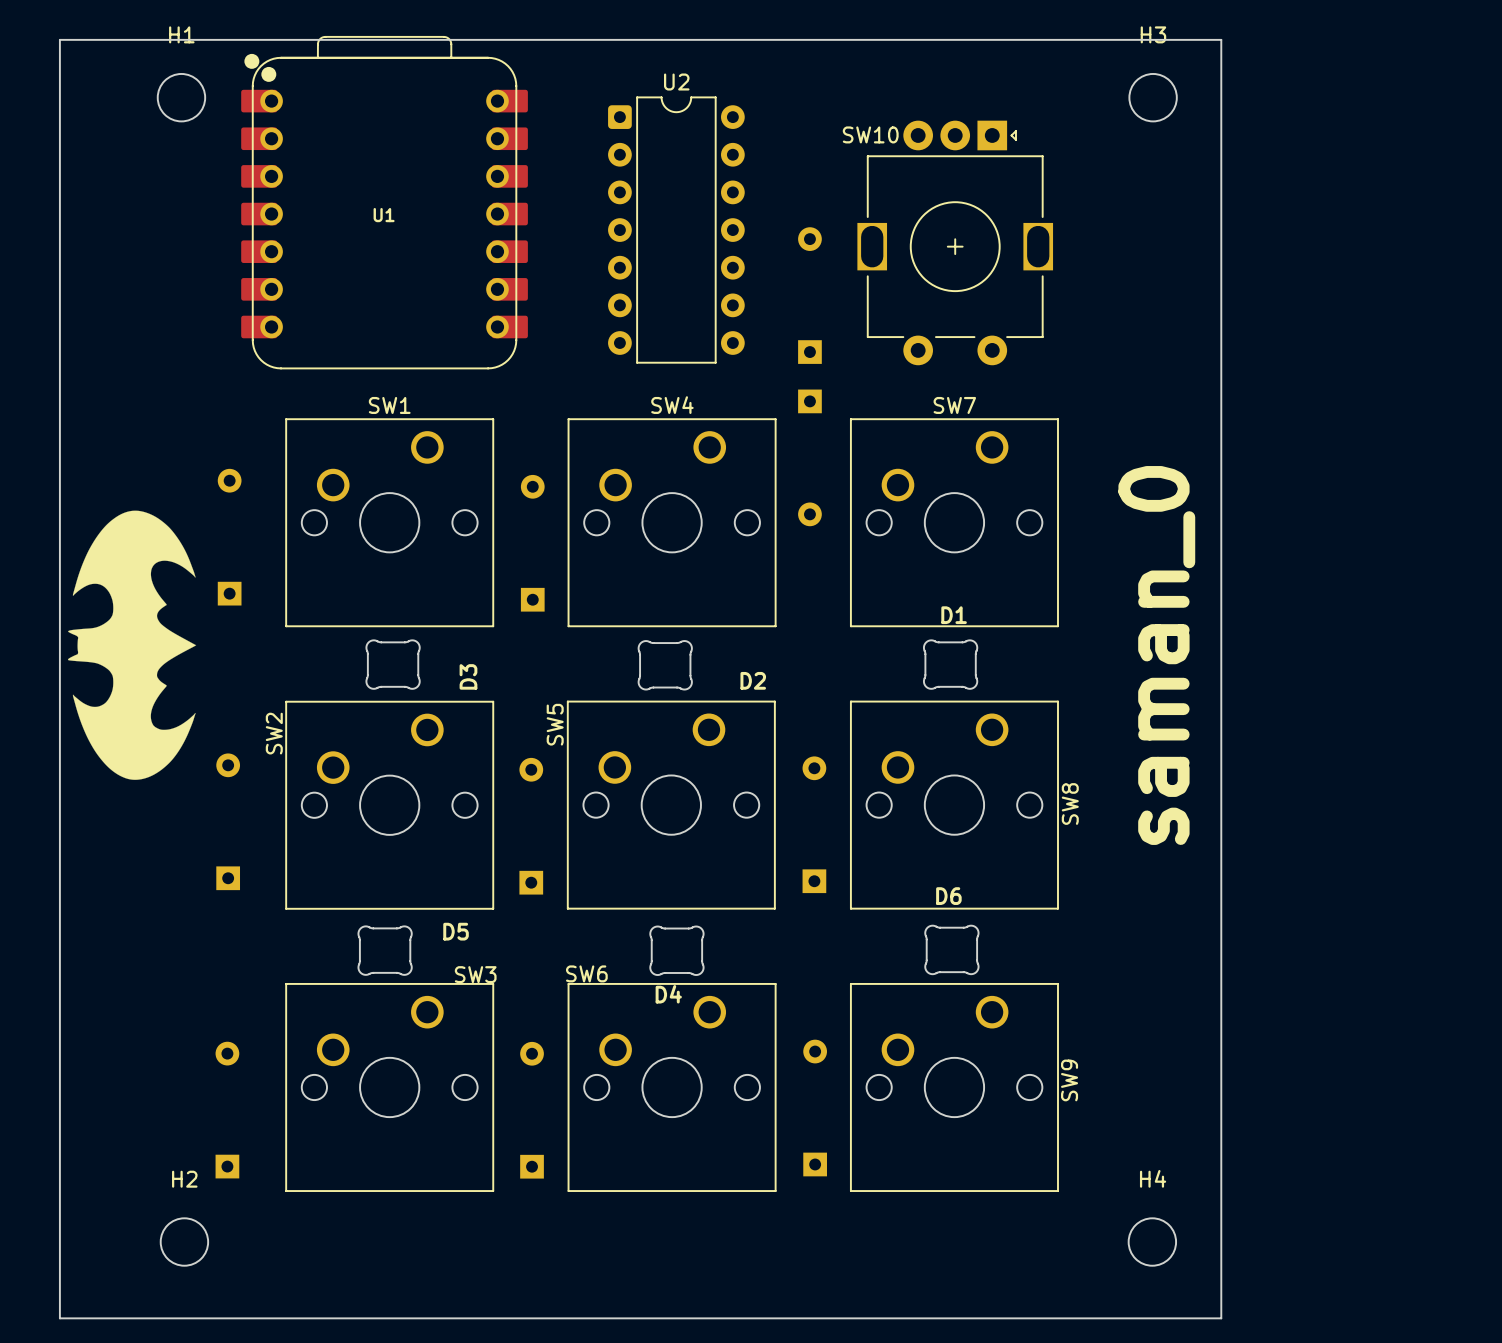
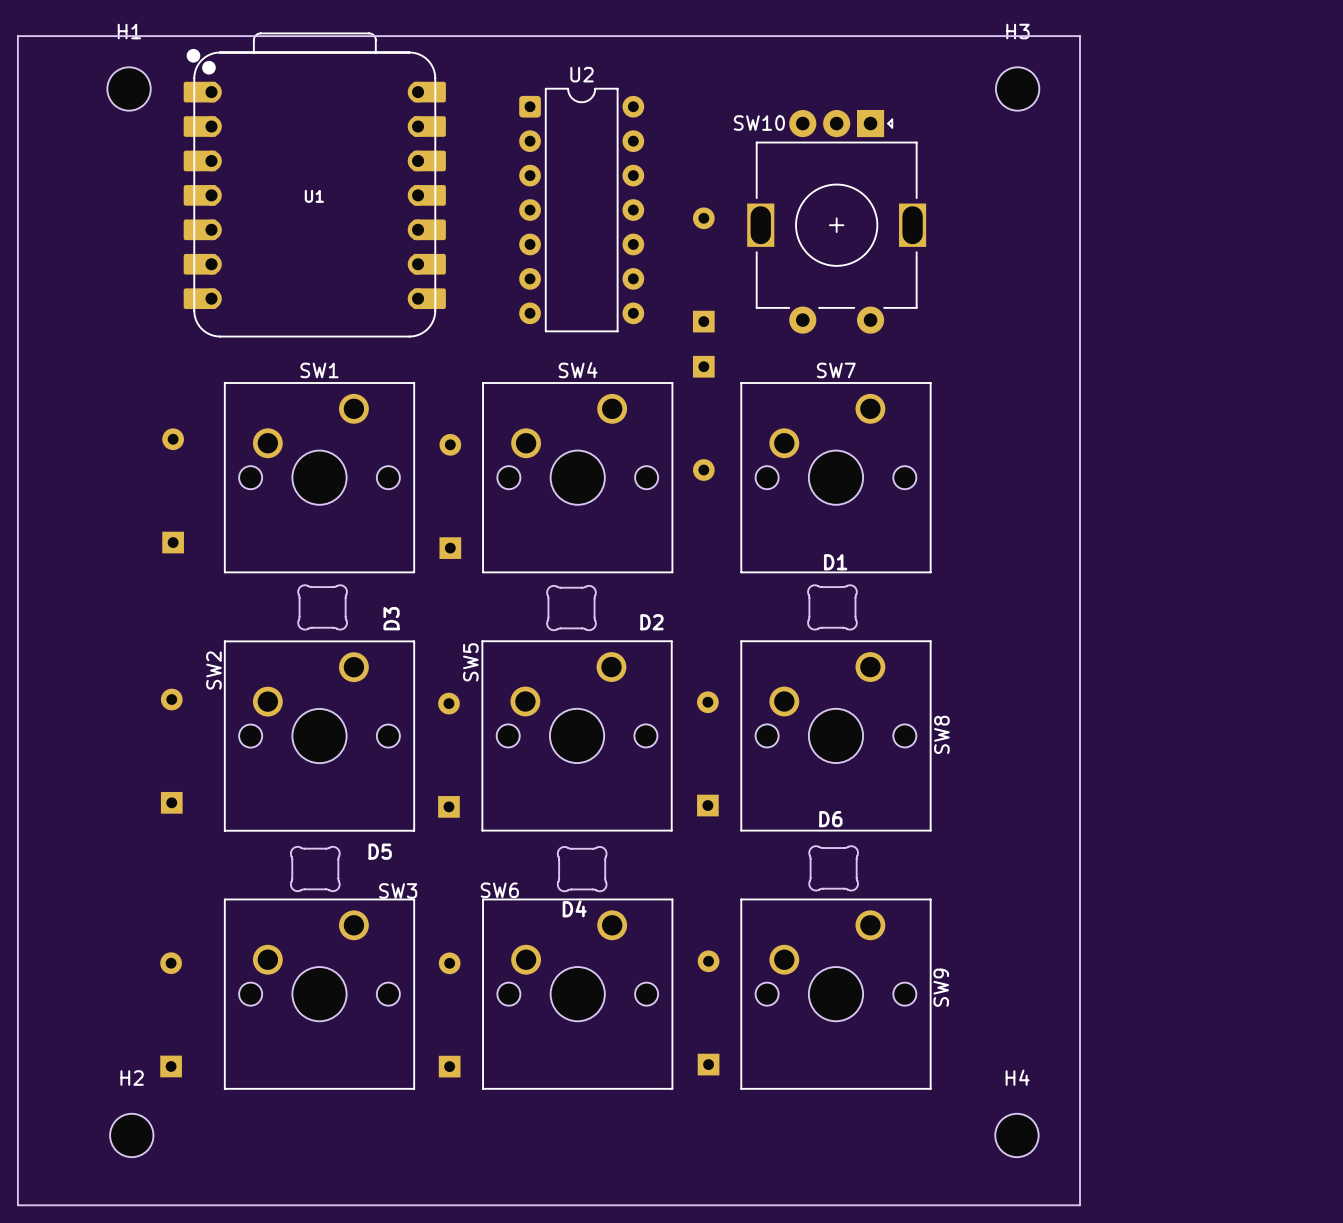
drawing: [67, 510, 197, 780] -> none
text: saman_0 (1156, 655) -> none

